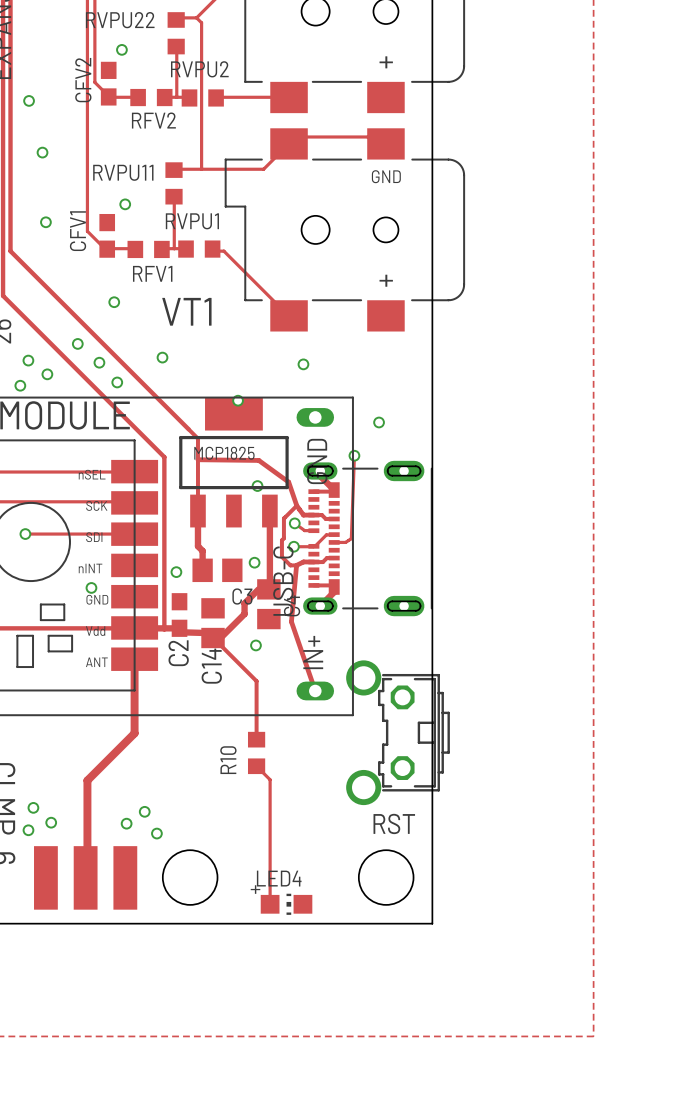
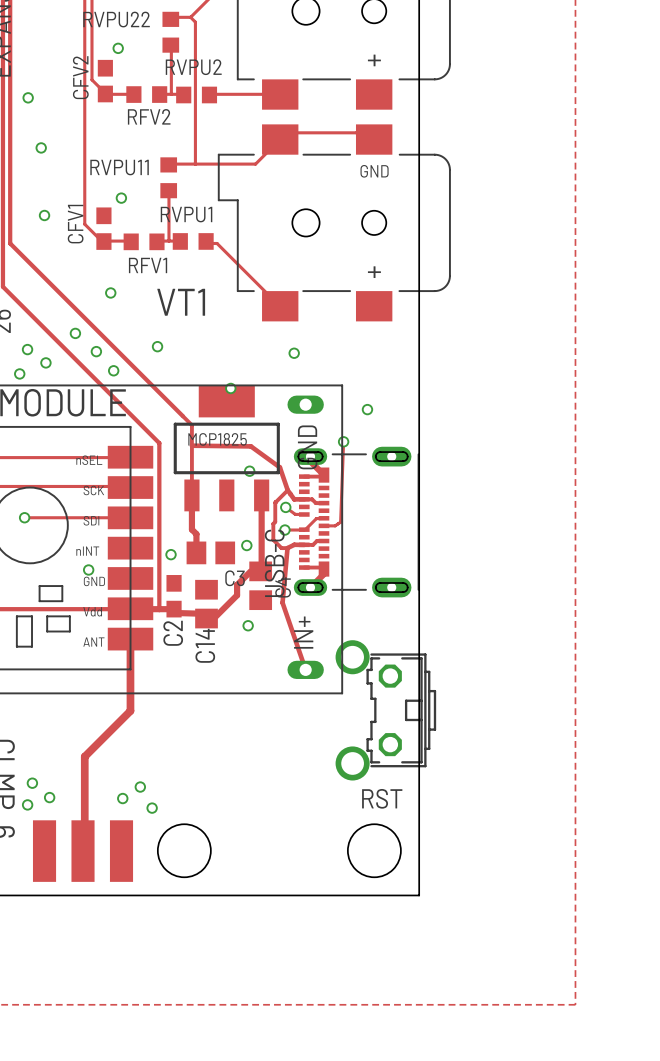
track: (213, 638) (256, 681) (256, 739) -> none
R10: (256, 752) -> none
track: (256, 766) (270, 779) (270, 904) -> none
LED4: (286, 904) -> none

